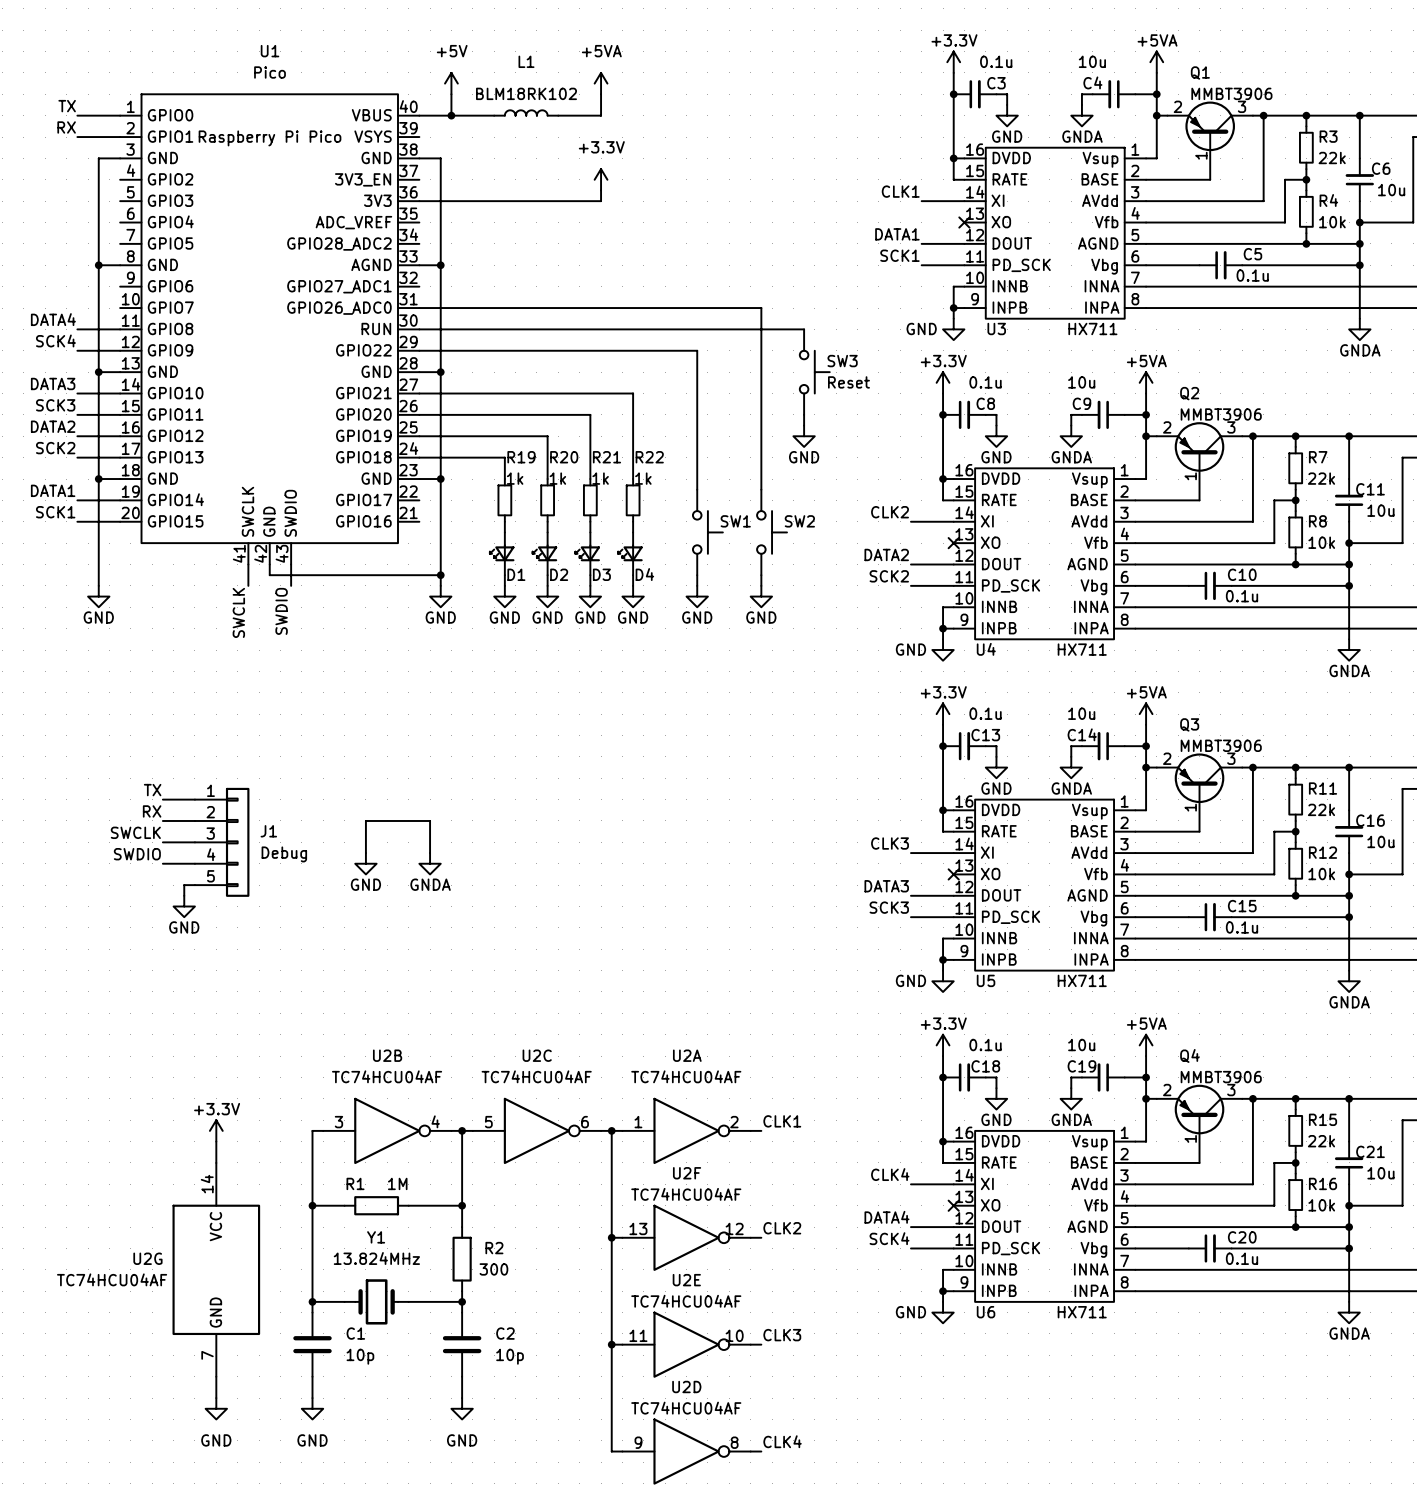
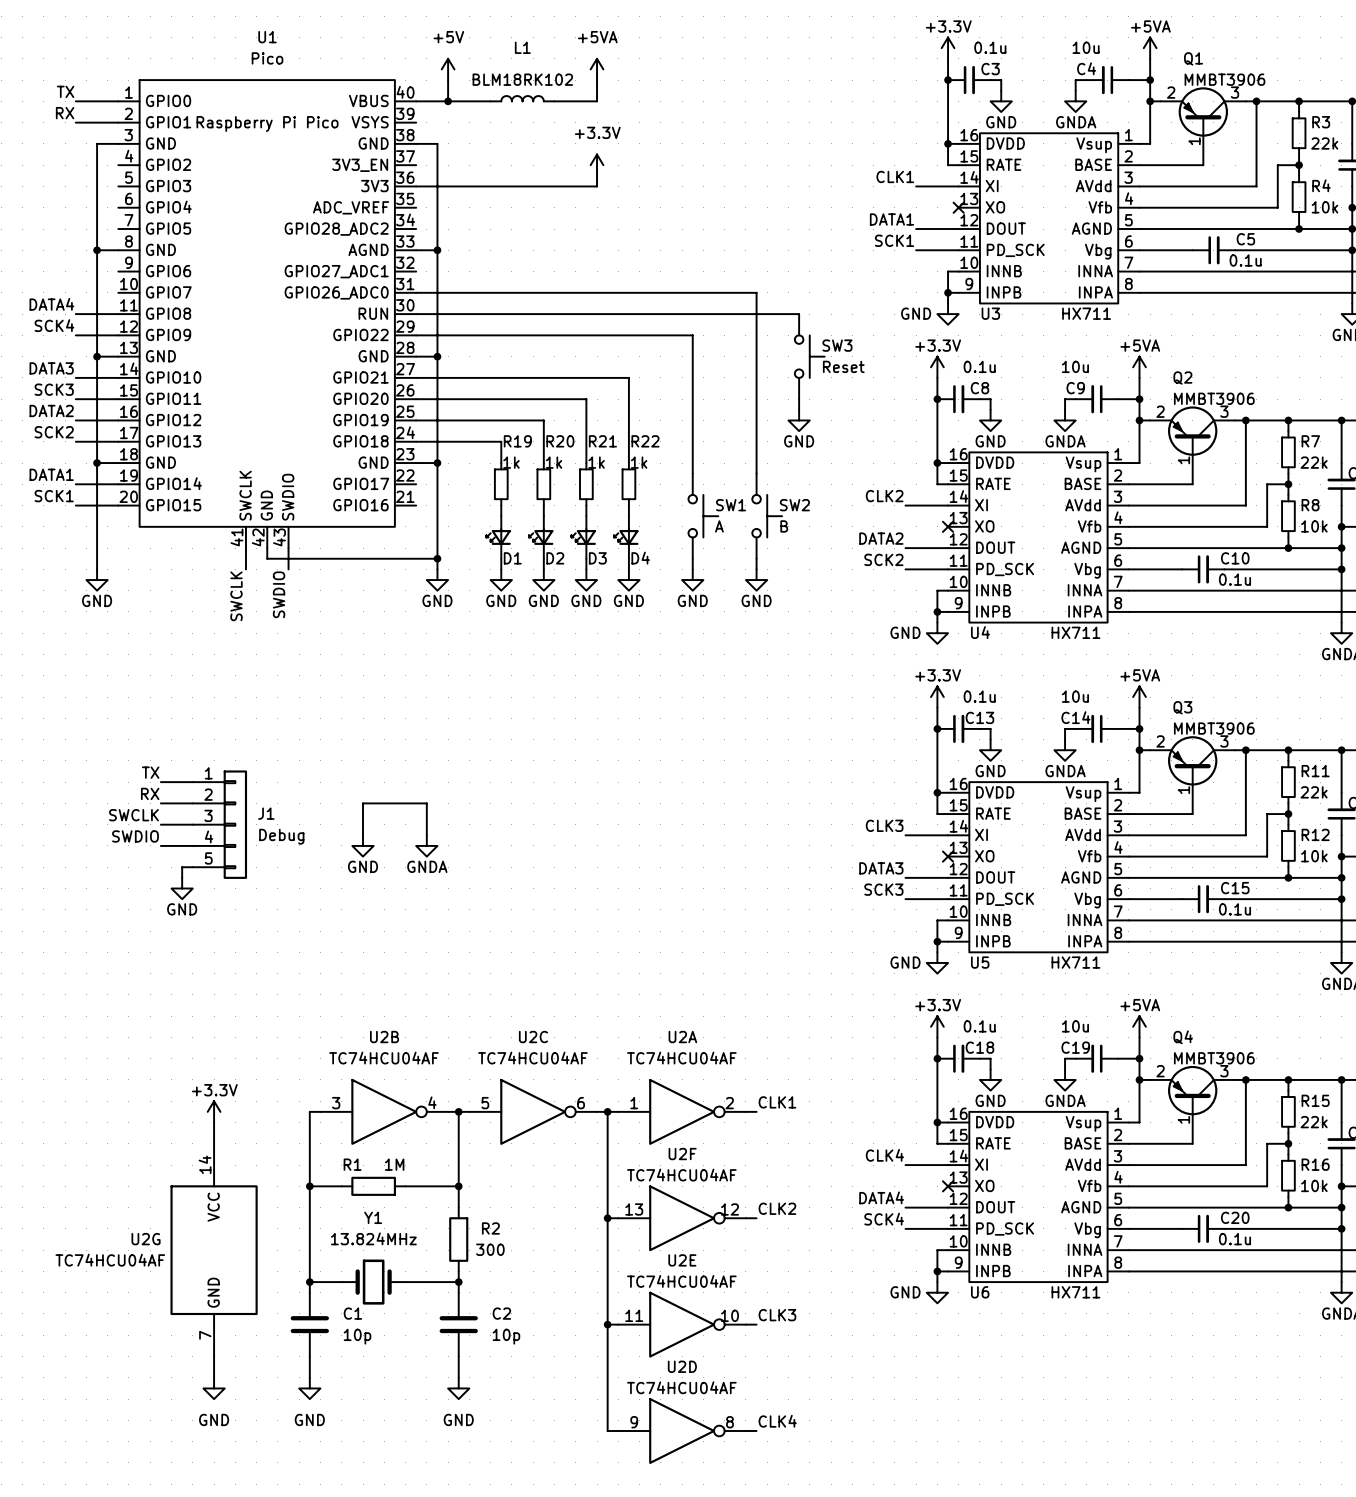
SW1 value: none -> A (719, 526)
SW2 value: none -> B (784, 526)

